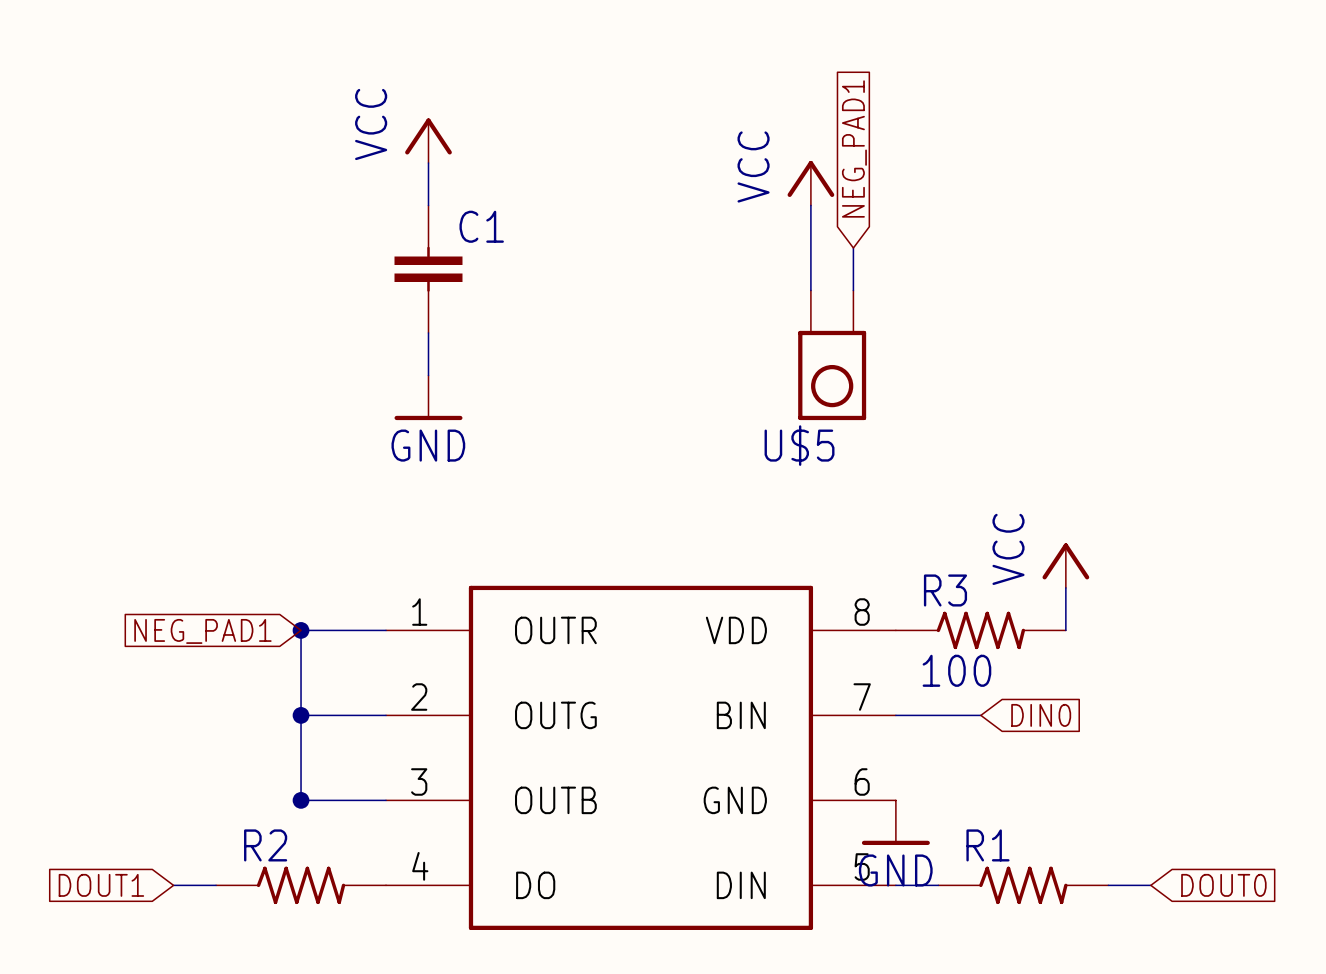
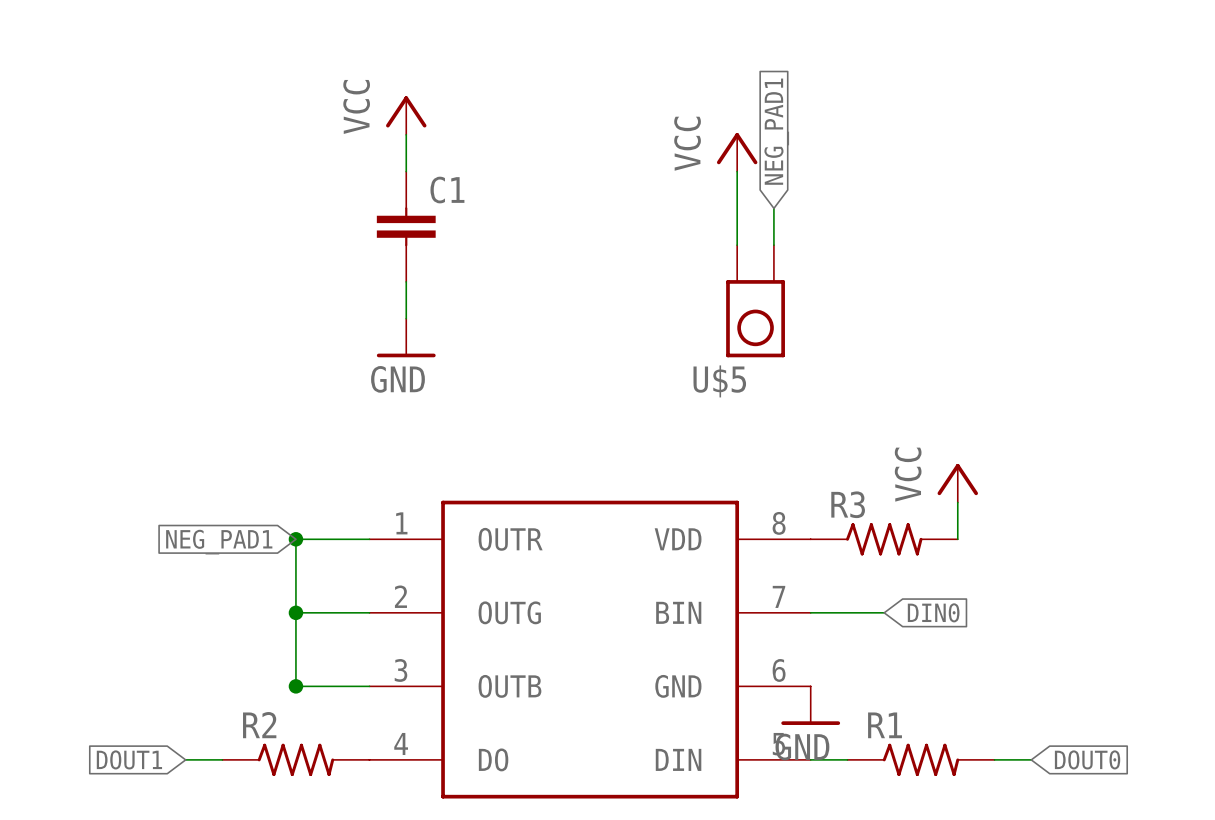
R3 value: 100 (956, 670) -> none

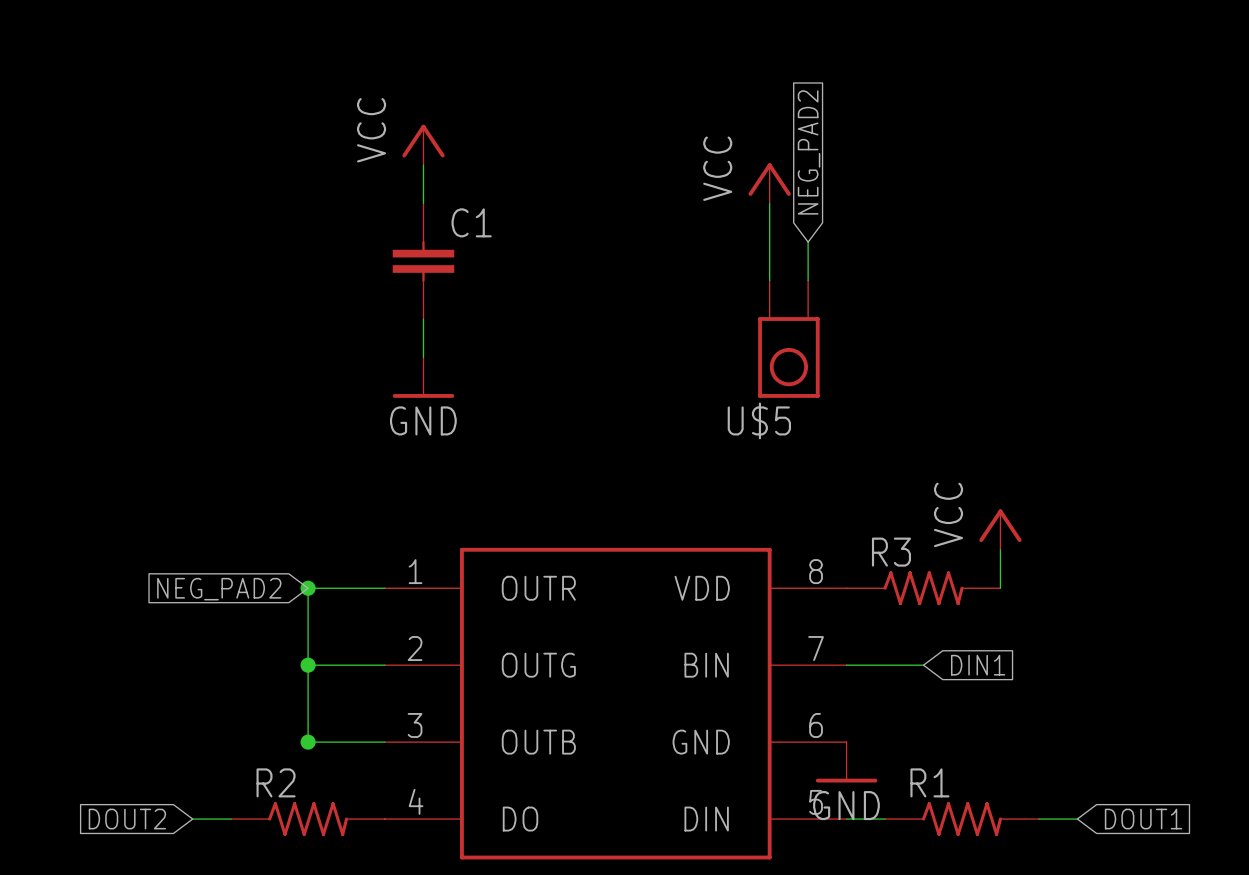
global label: NEG_PAD1 (776, 131) -> NEG_PAD2 (809, 152)
global label: NEG_PAD1 (219, 542) -> NEG_PAD2 (219, 589)
global label: DIN0 (933, 612) -> DIN1 (978, 665)
global label: DOUT1 (129, 759) -> DOUT2 (127, 819)
global label: DOUT0 (1087, 759) -> DOUT1 (1143, 819)

